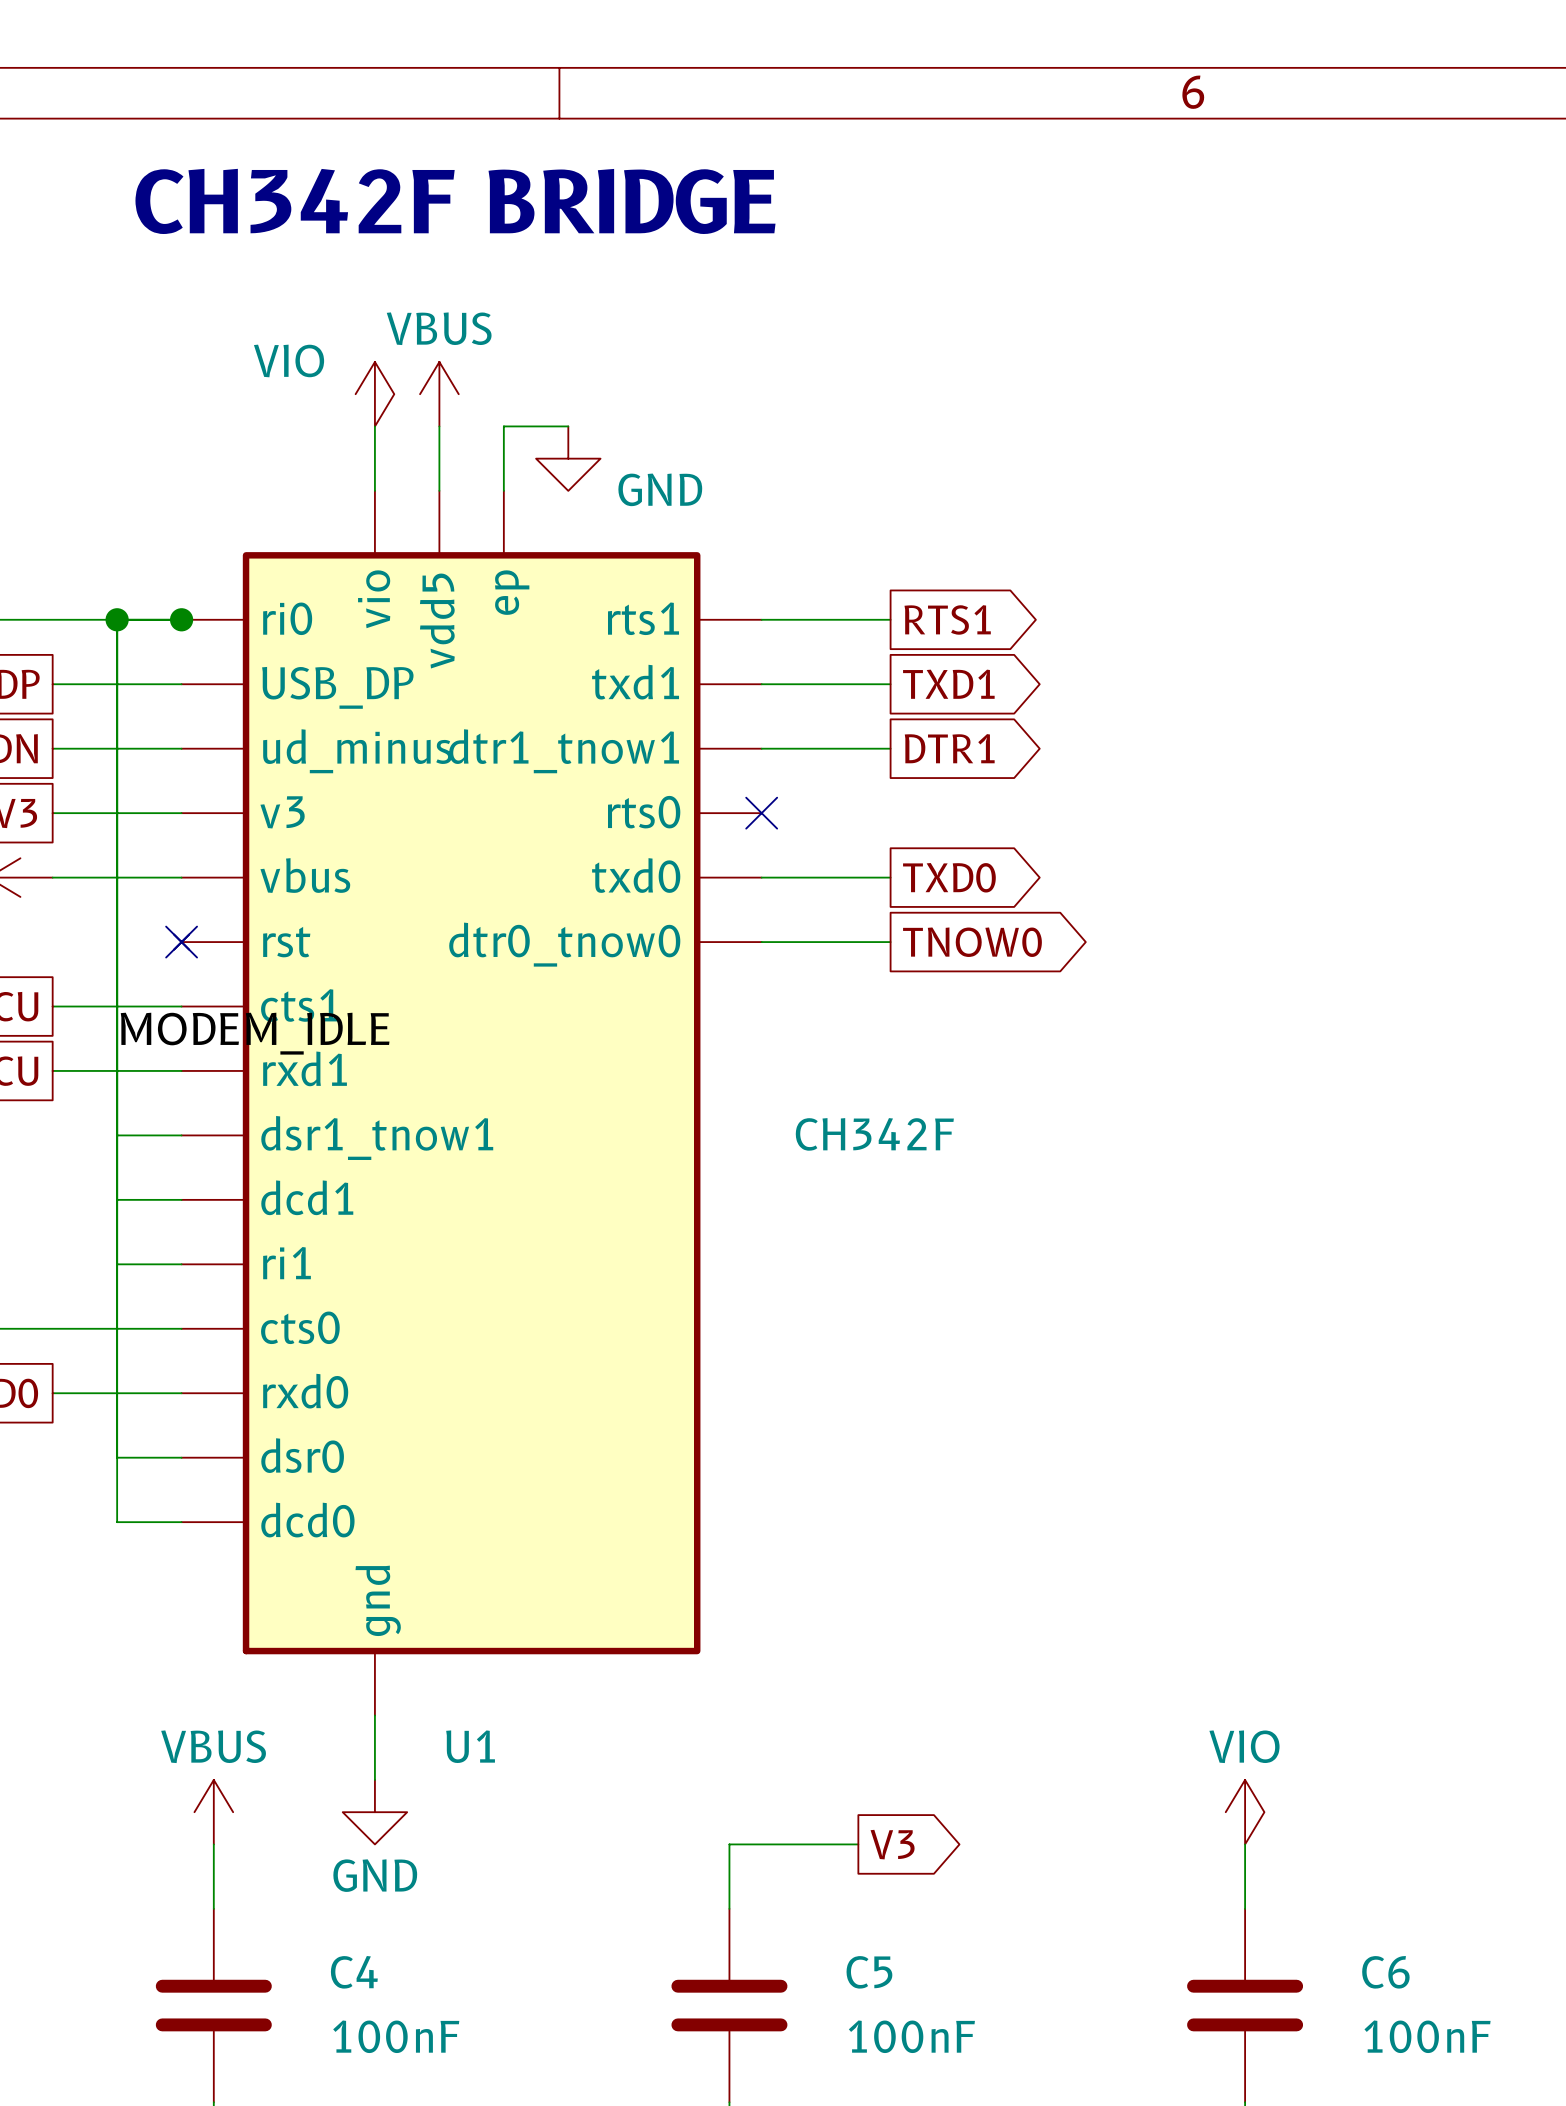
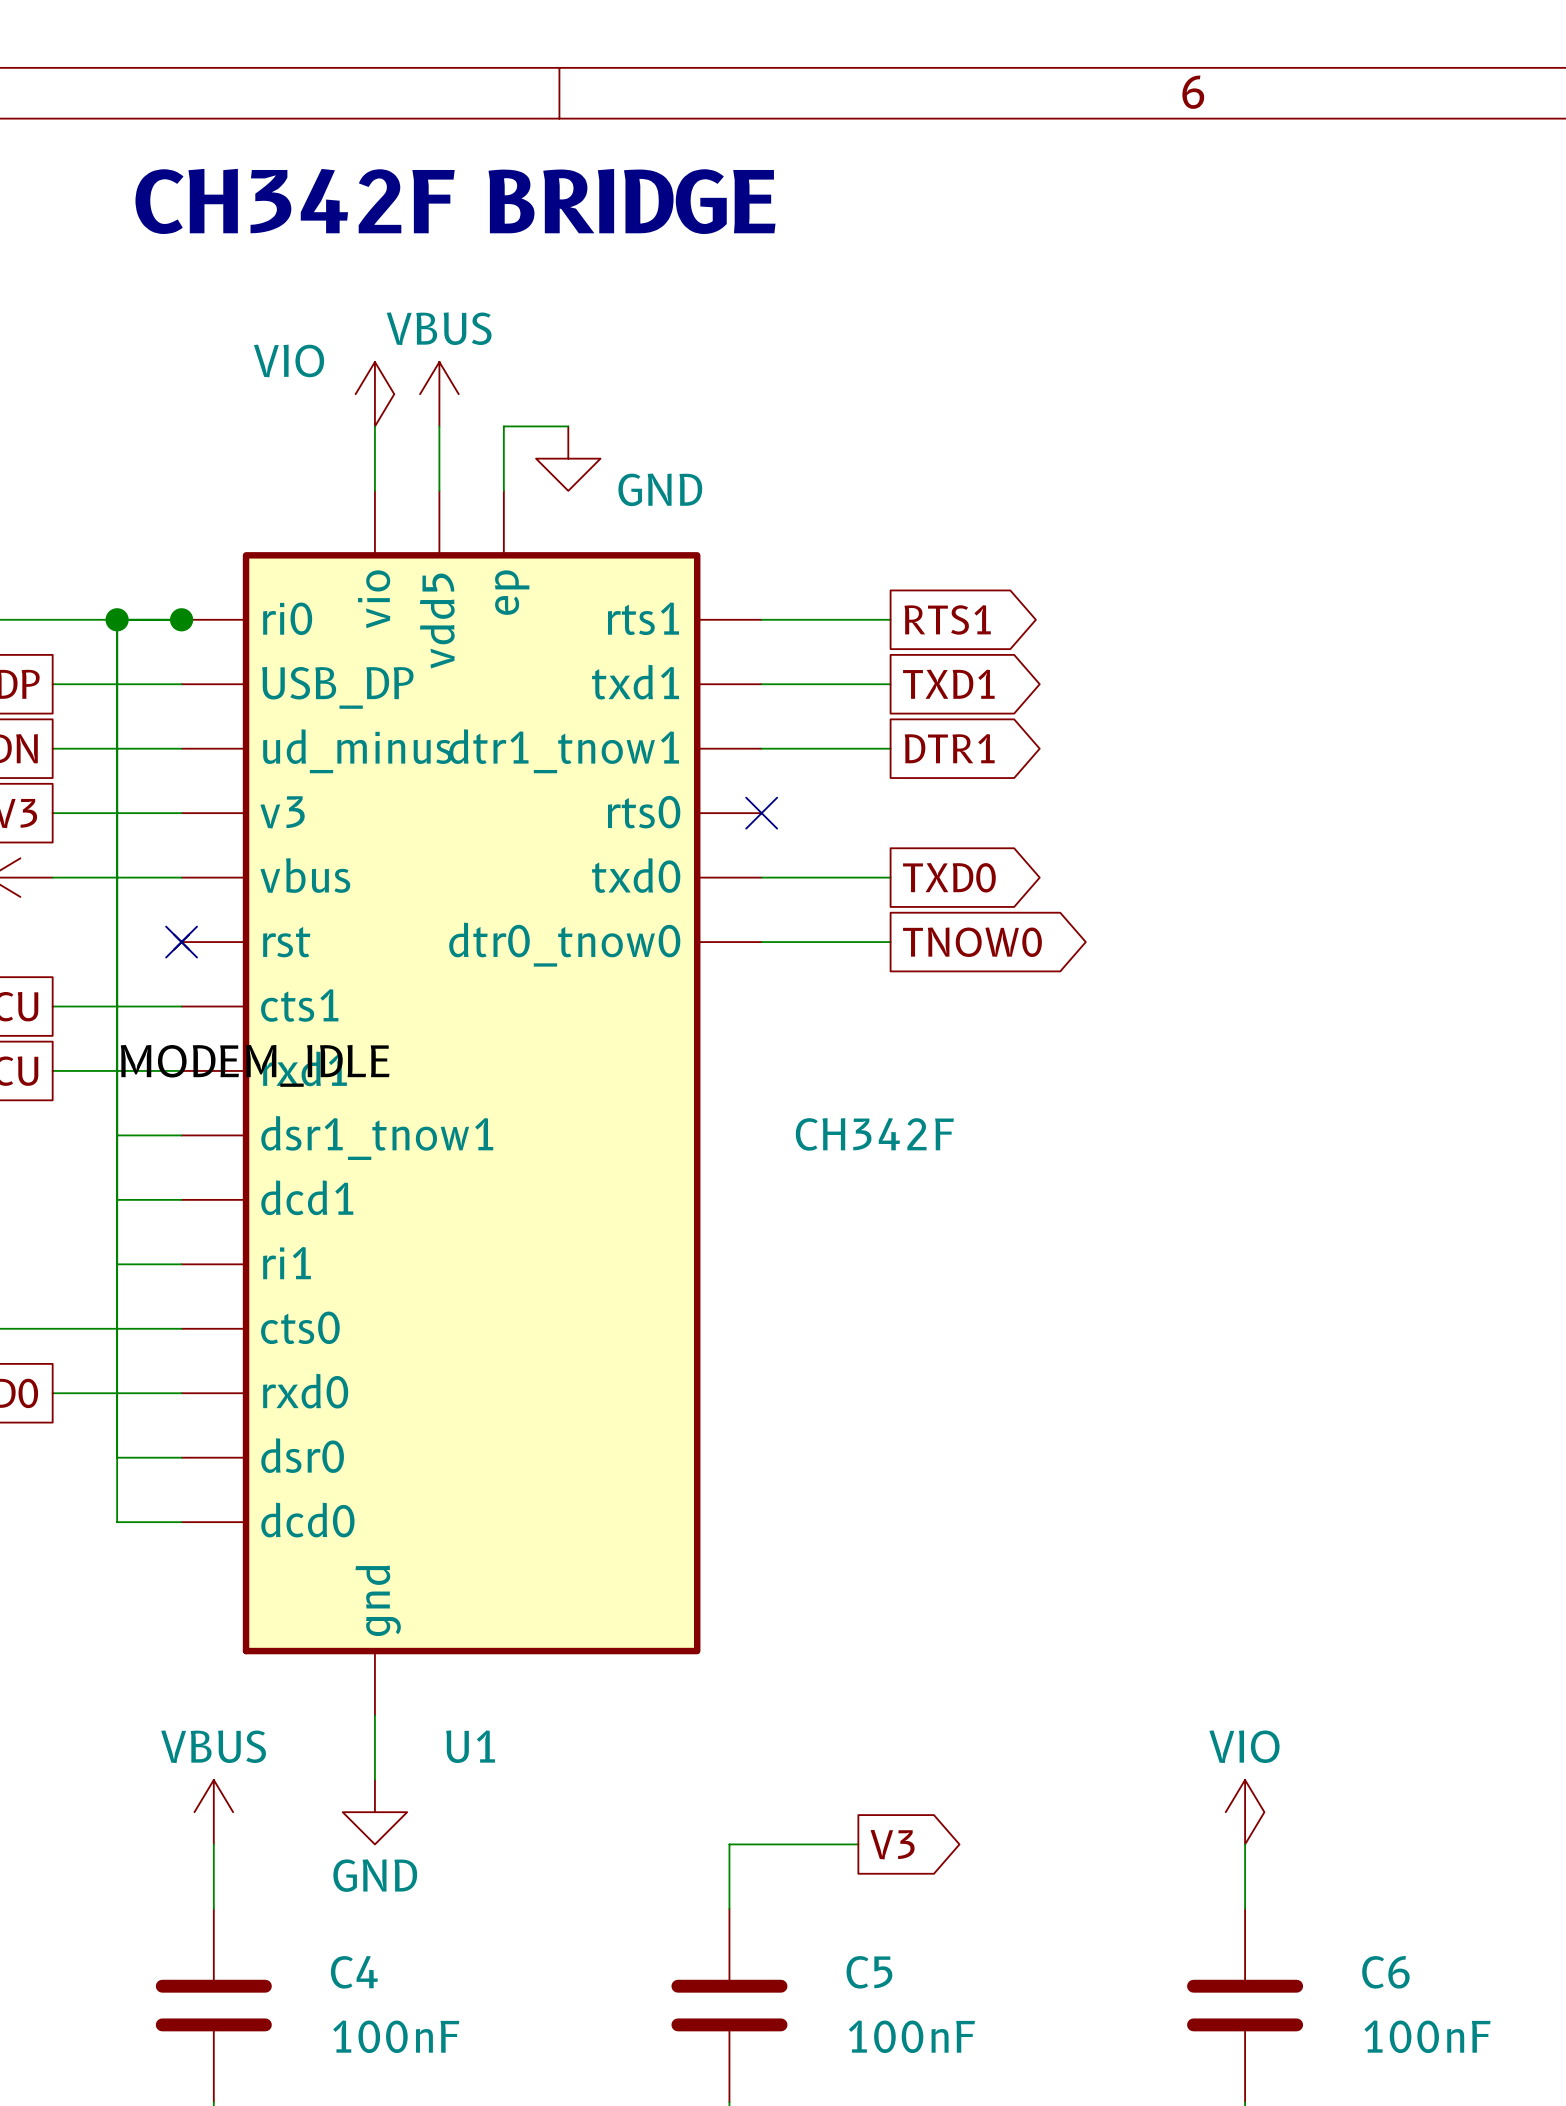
label position: MODEM_IDLE (255, 1033) -> MODEM_IDLE (255, 1065)

